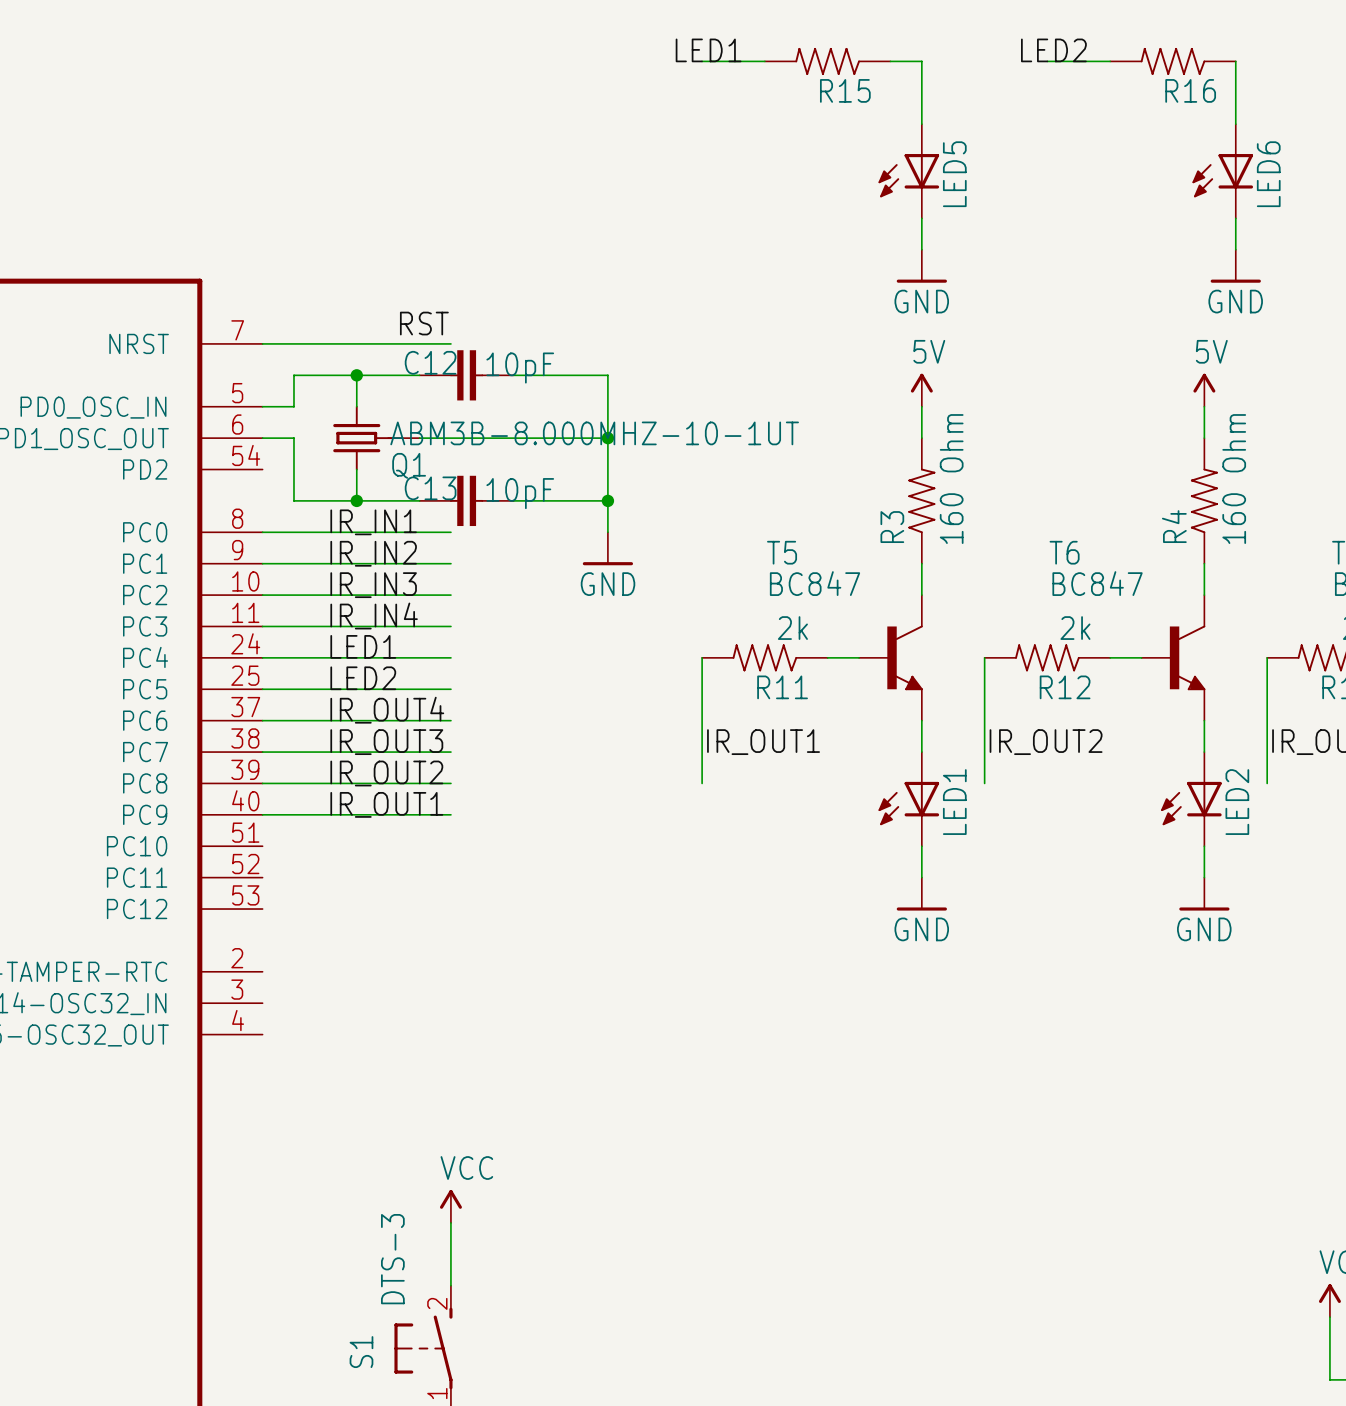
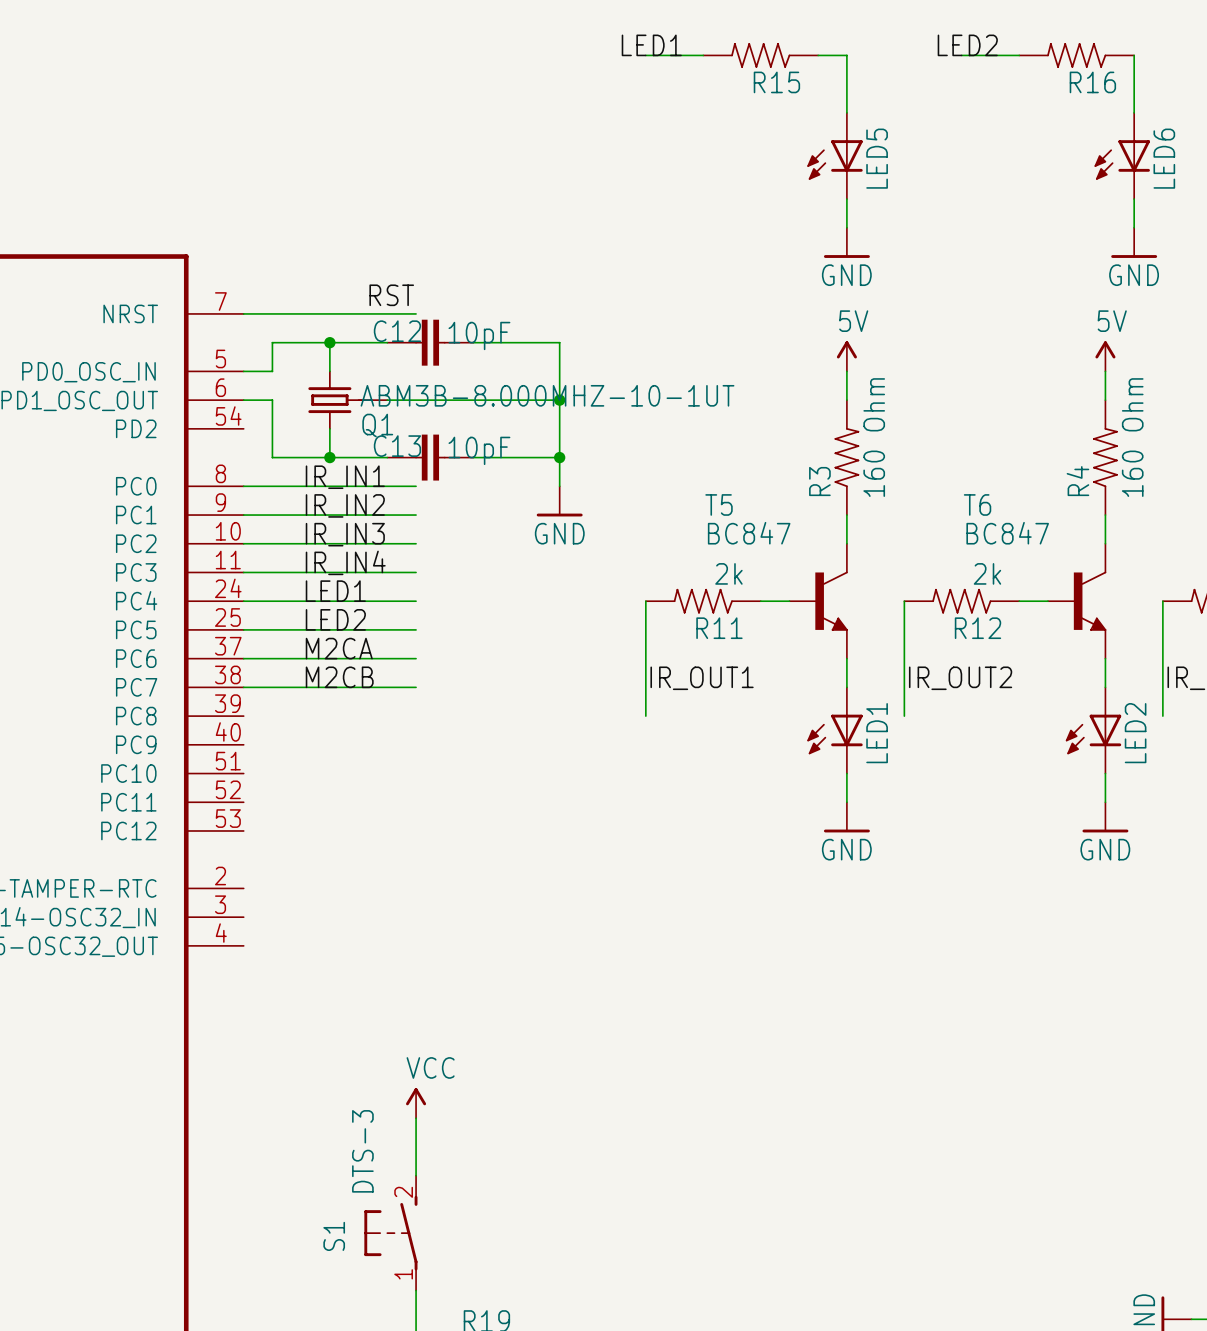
label: IR_OUT4 (387, 710) -> M2CA (339, 648)
label: IR_OUT3 (386, 742) -> M2CB (339, 677)
label: IR_OUT2 (386, 773) -> none
wire: (262, 783) (450, 783) -> none
label: IR_OUT1 (386, 804) -> none
wire: (262, 814) (450, 814) -> none

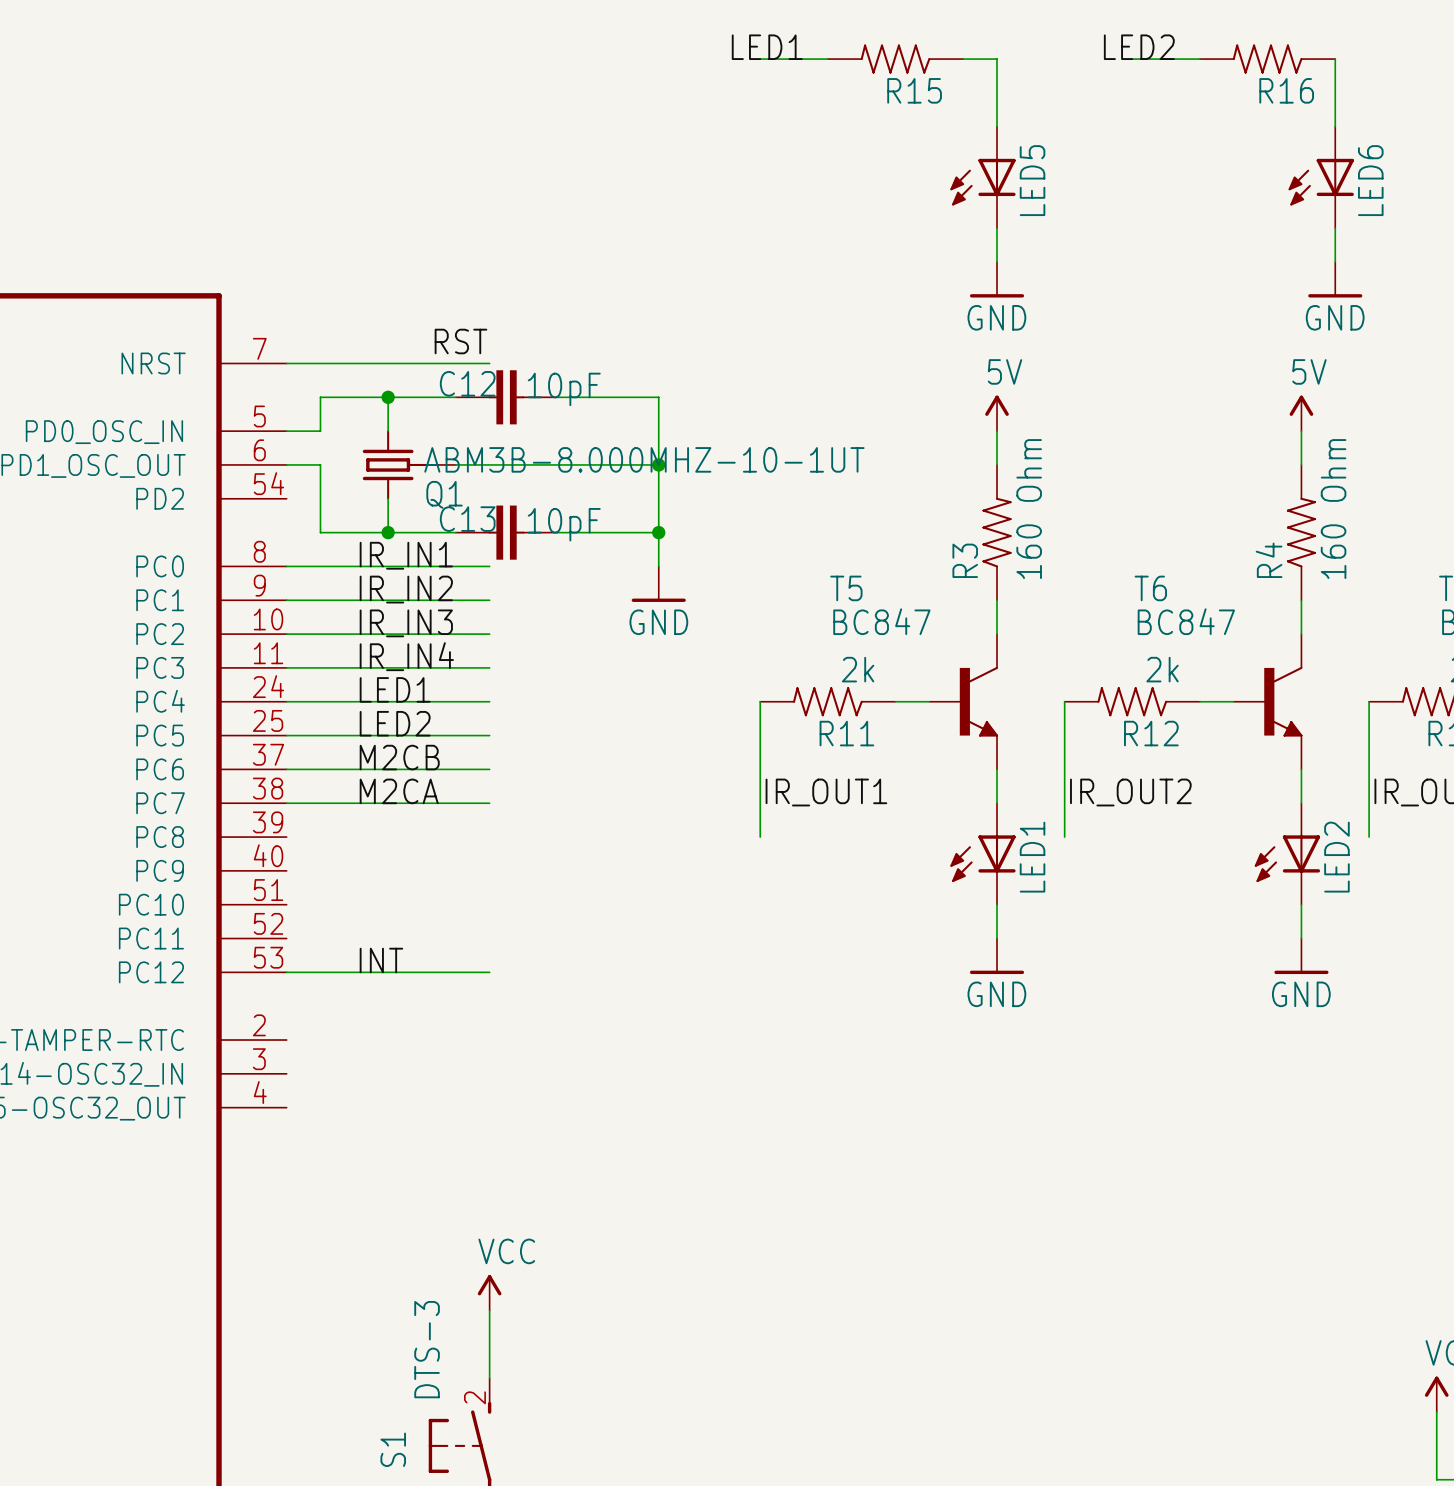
label: M2CA (339, 648) -> M2CB (399, 757)
label: M2CB (339, 677) -> M2CA (399, 791)
label: none -> INT (381, 960)
wire: none -> (286, 972) (489, 972)

